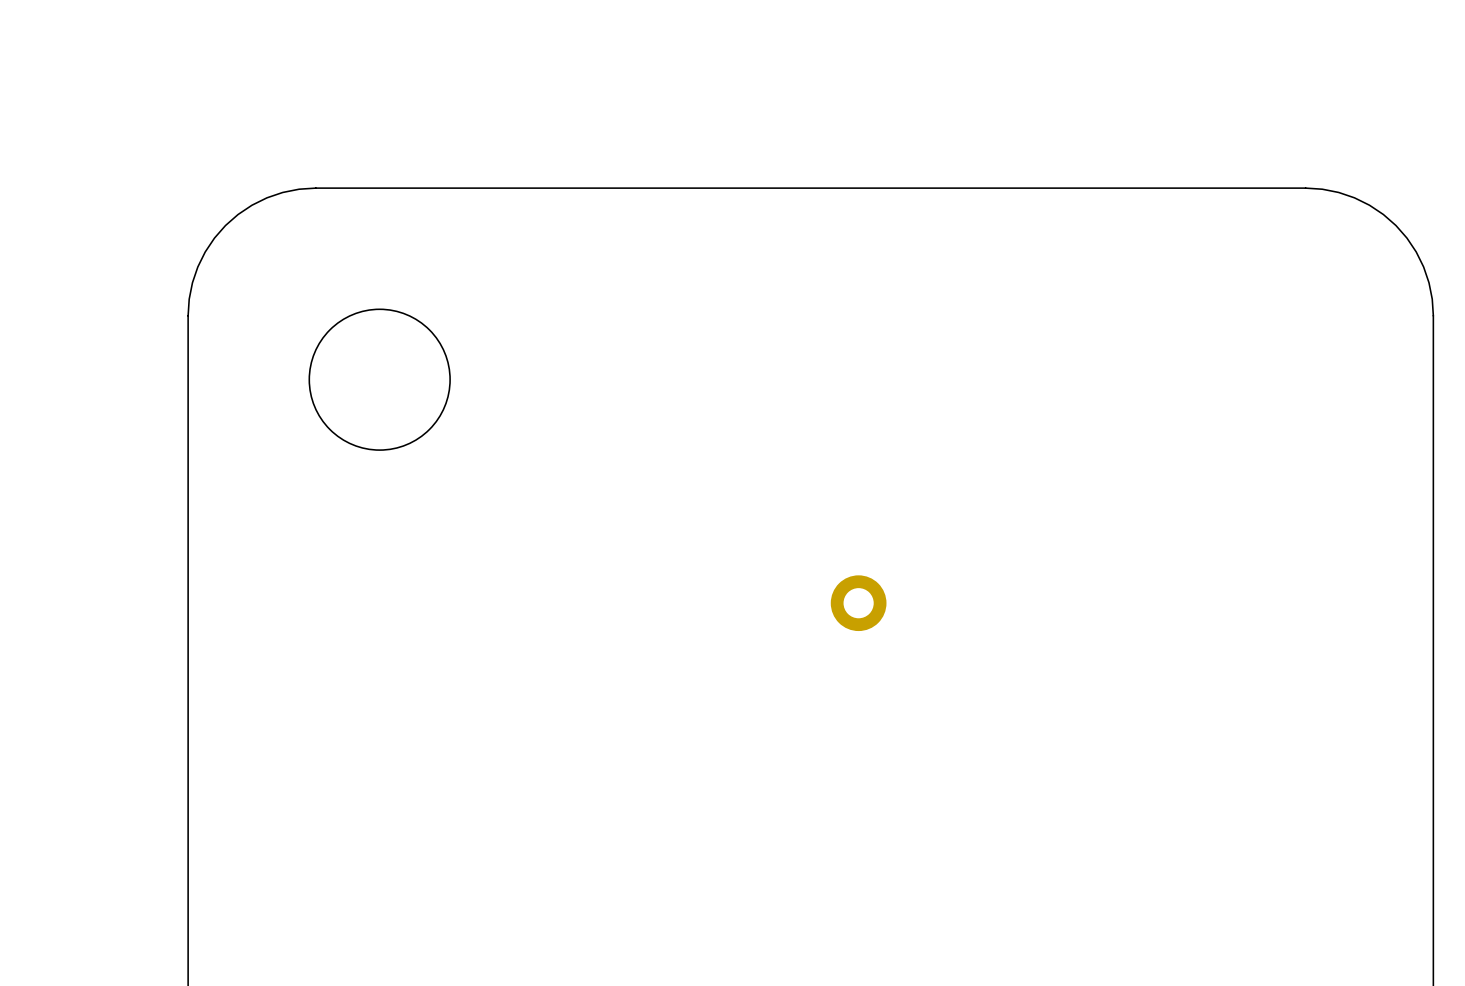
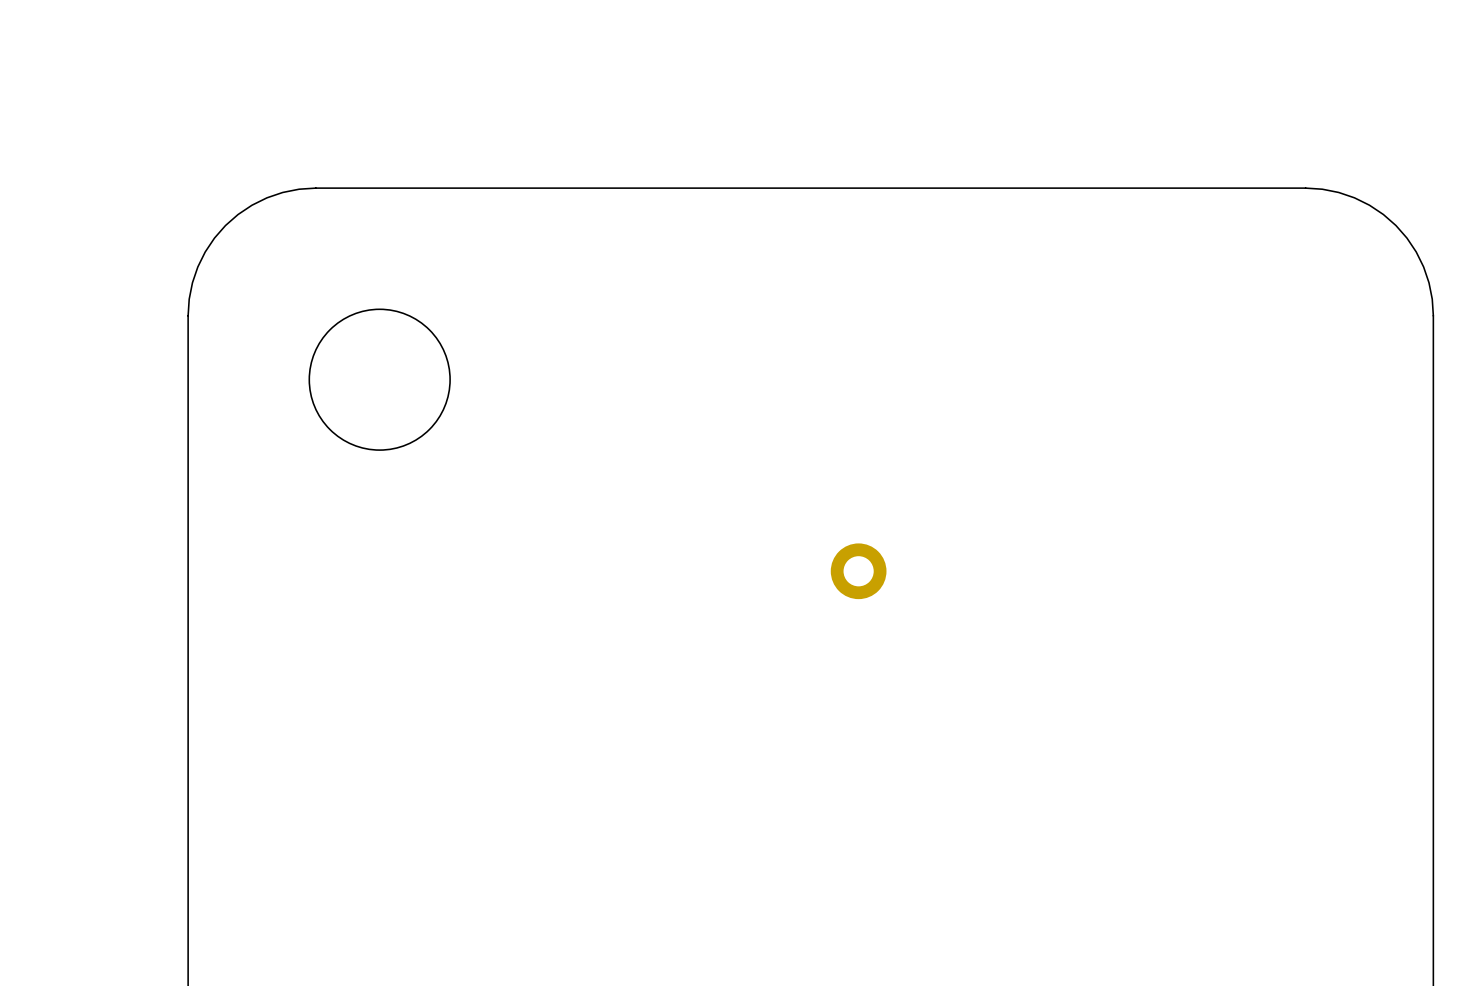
part position: (858, 603) -> (858, 571)

